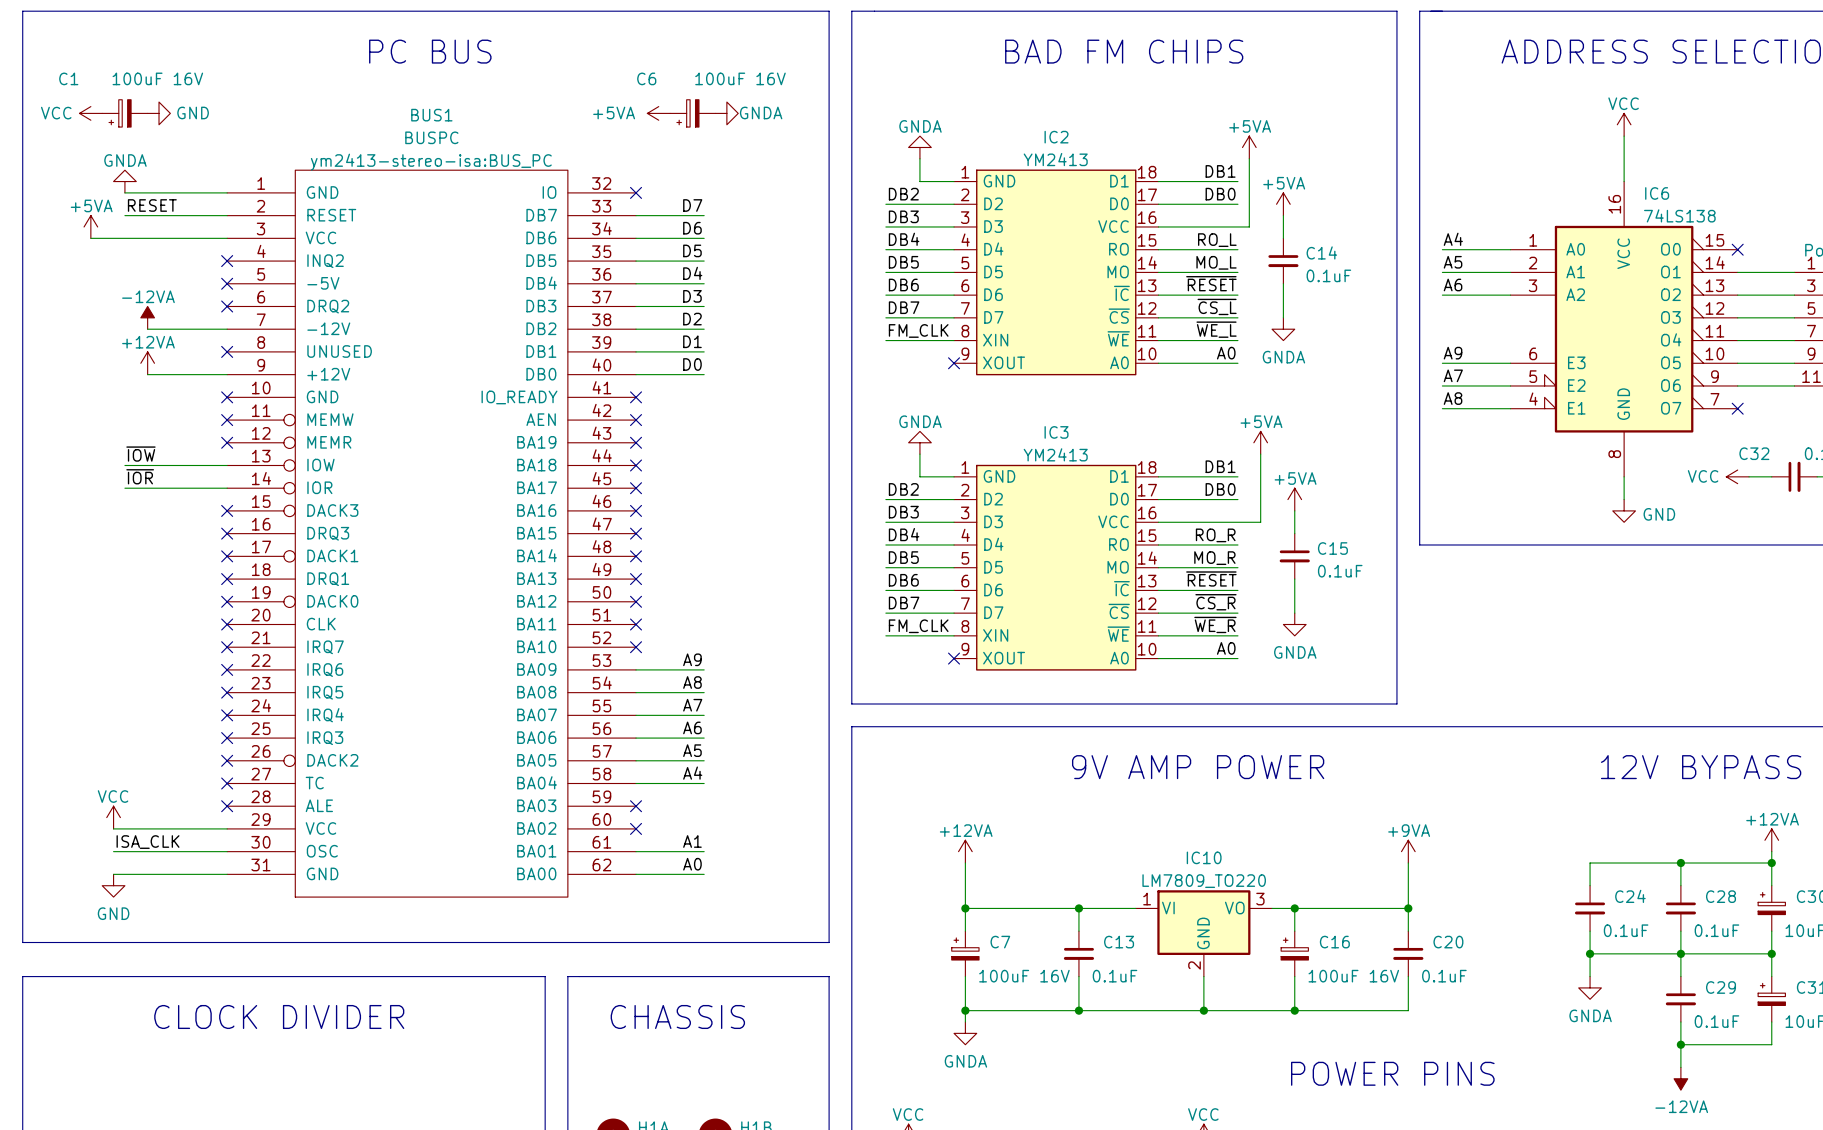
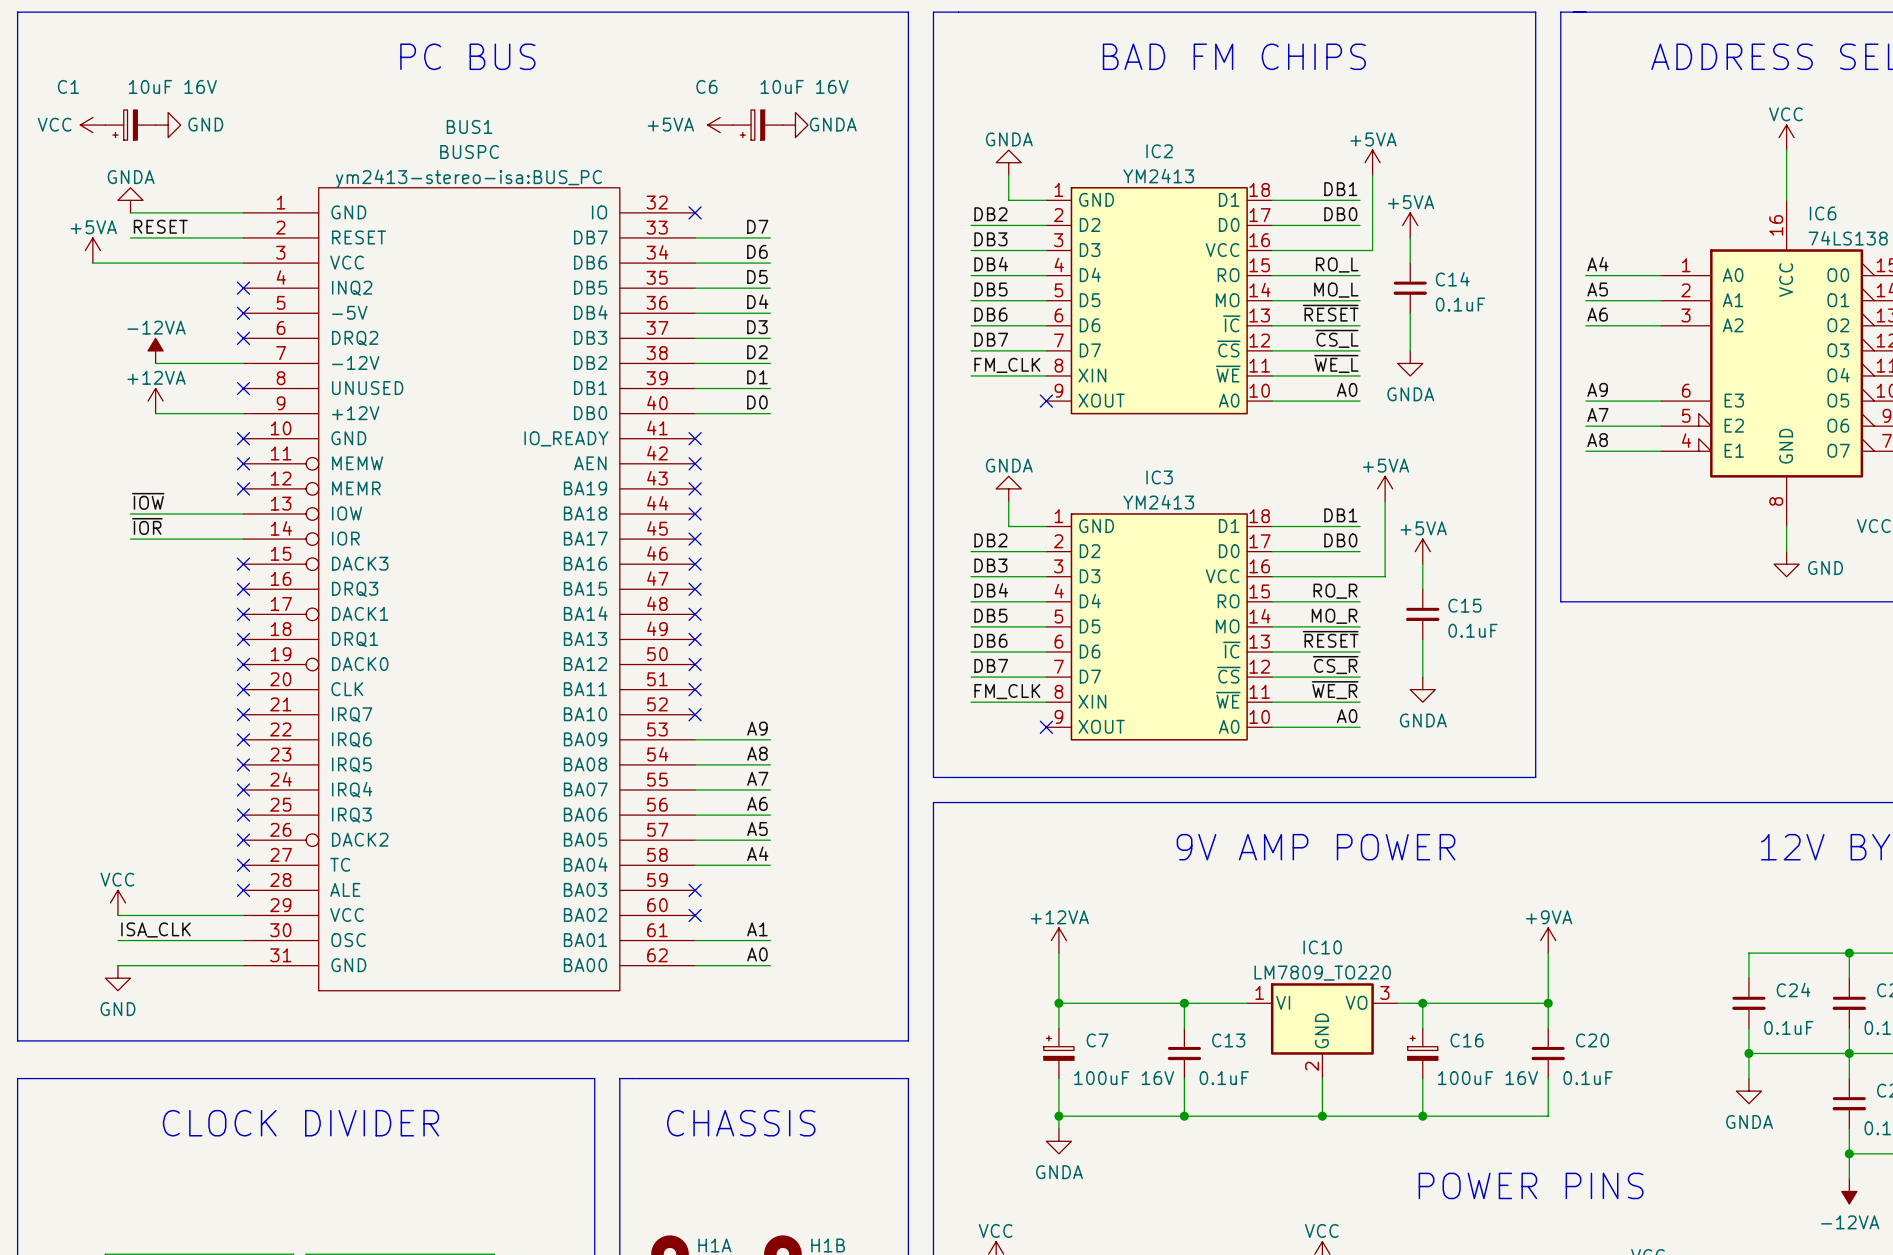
C1 value: 100uF 16V (157, 78) -> 10uF 16V (172, 86)
C6 value: 100uF 16V (740, 78) -> 10uF 16V (804, 86)

